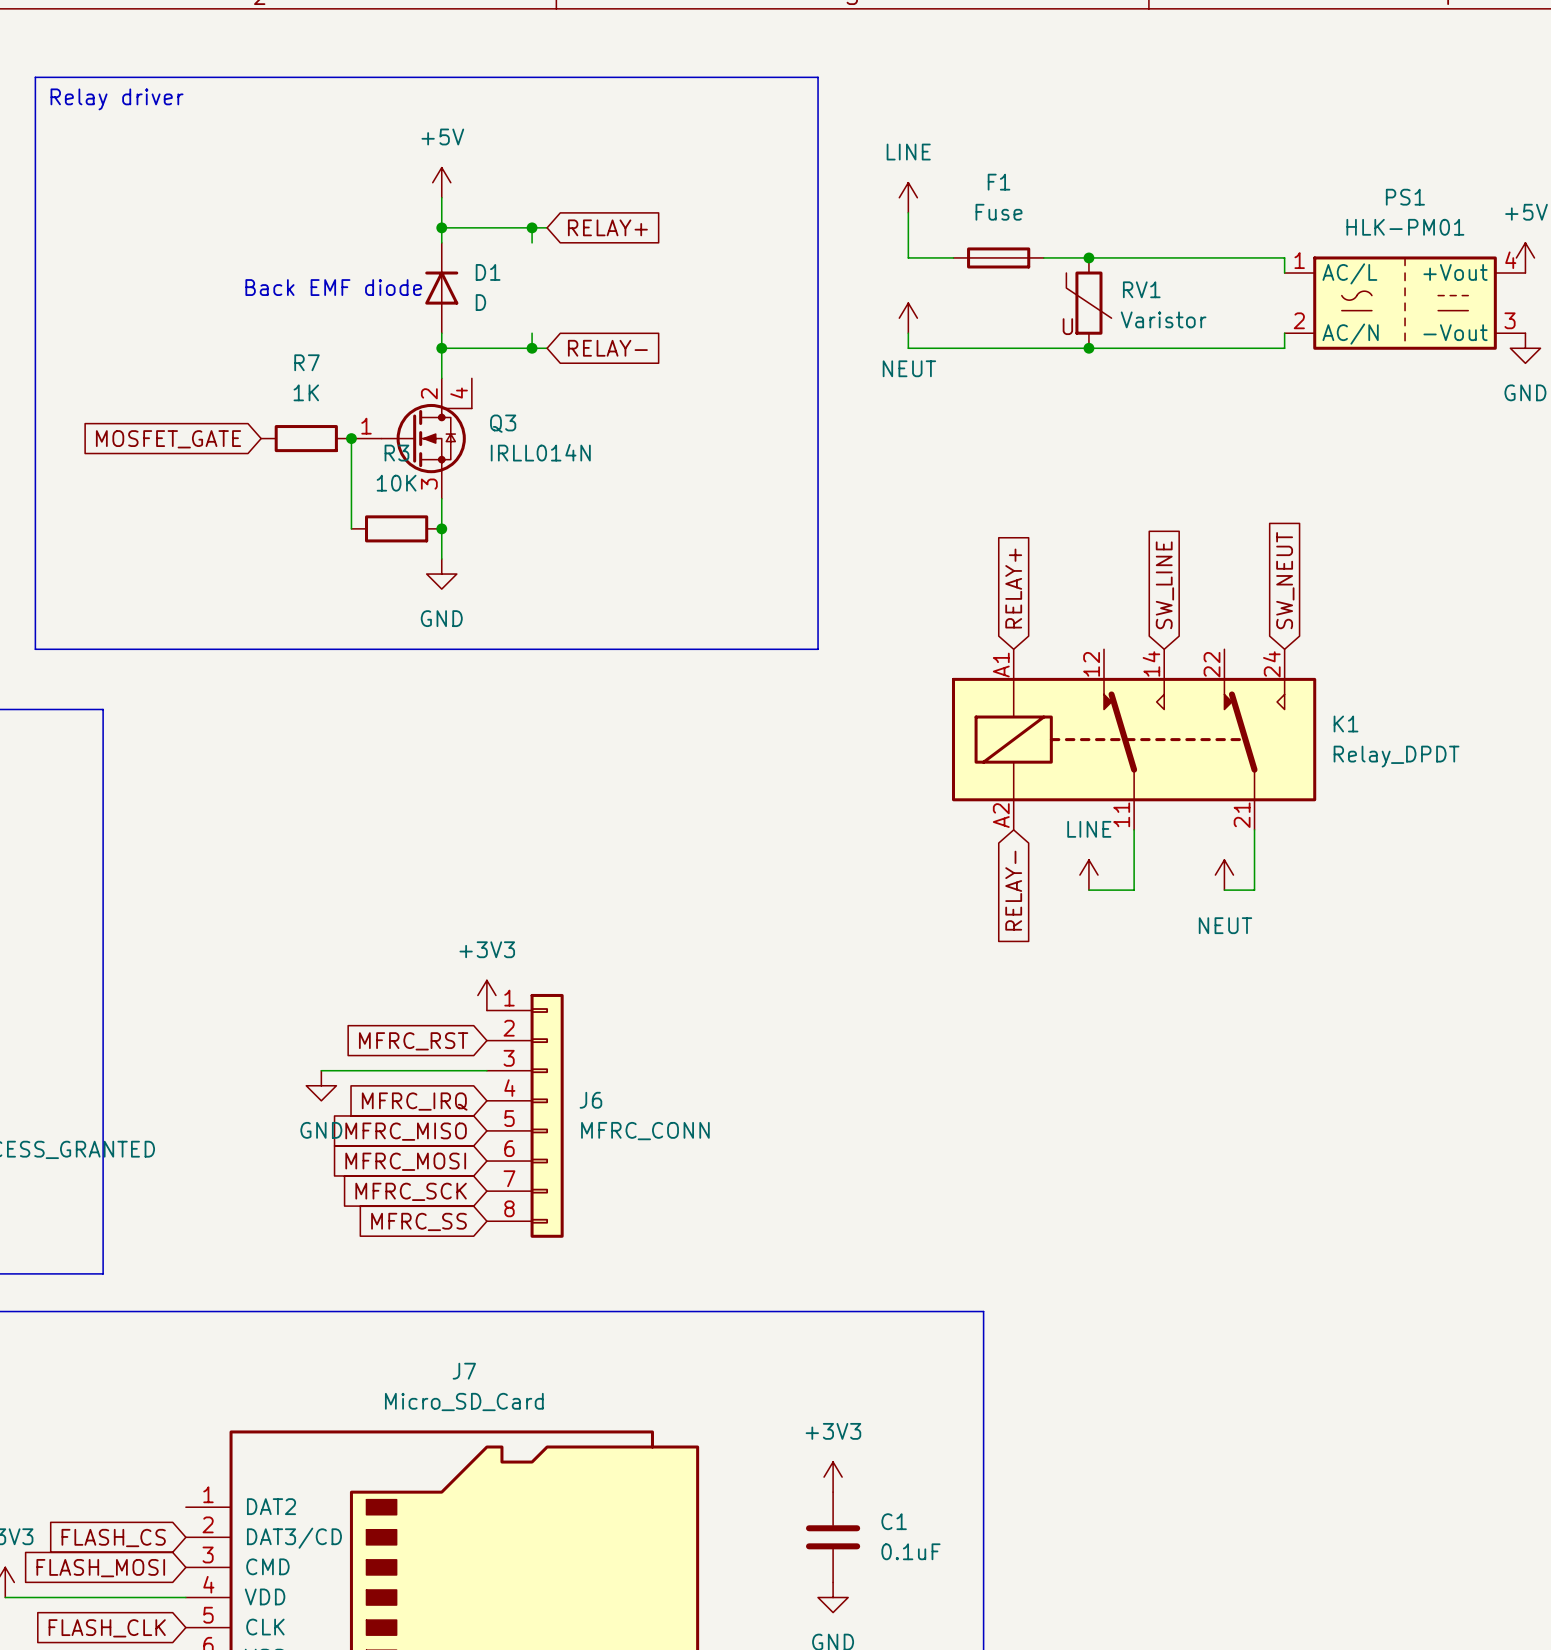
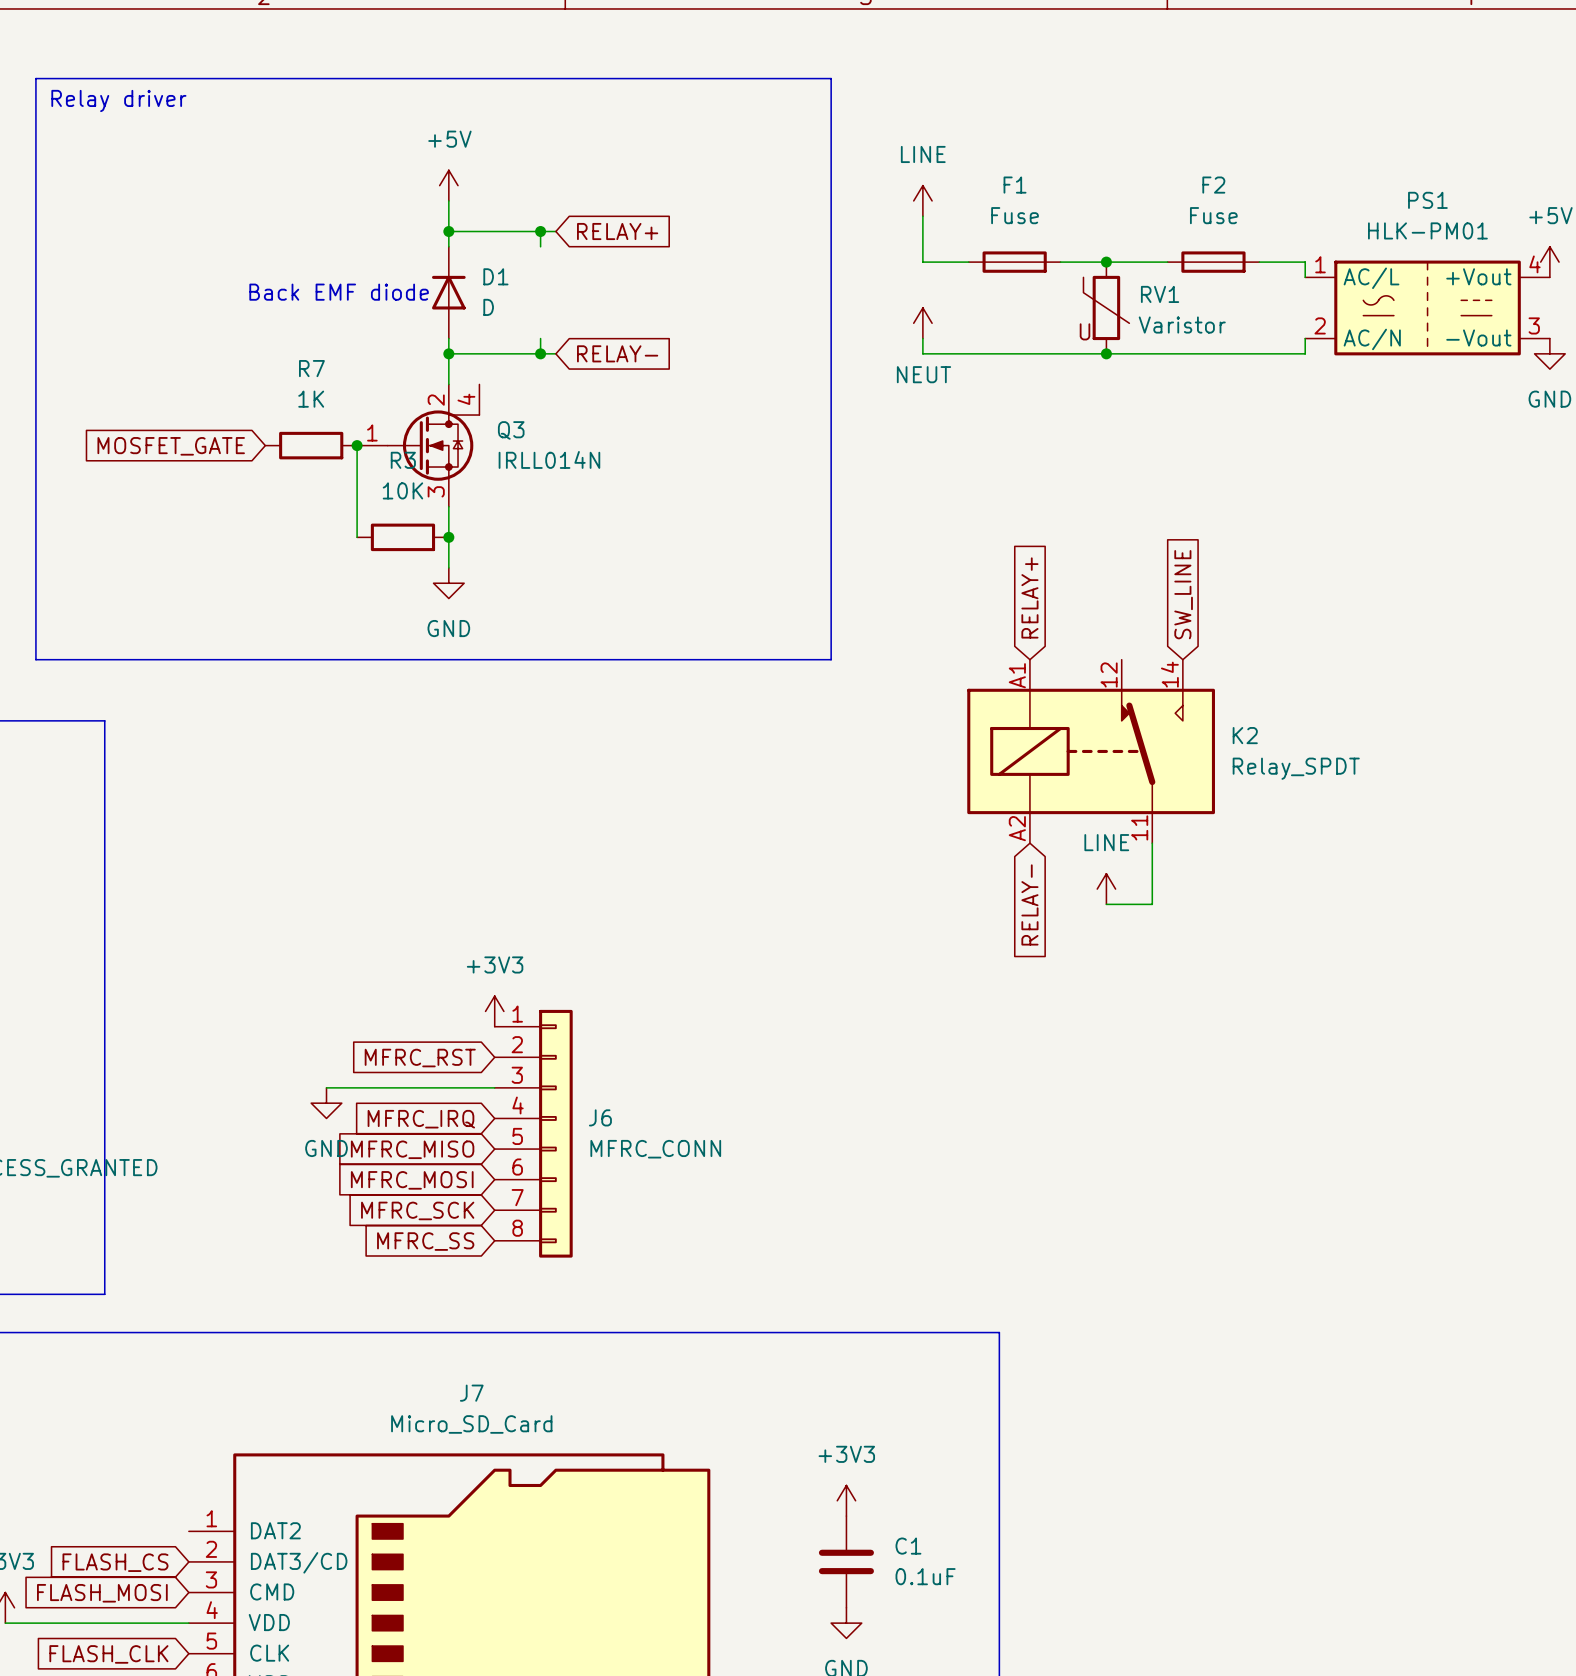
F2: none -> Fuse (1213, 262)
global label: SW_NEUT (1285, 580) -> none
K2: none -> Relay_SPDT (1091, 751)
K1: Relay_DPDT (1134, 739) -> none
wire: (1254, 829) (1254, 890) (1224, 890) -> none
power symbol: NEUT (1224, 875) -> none

